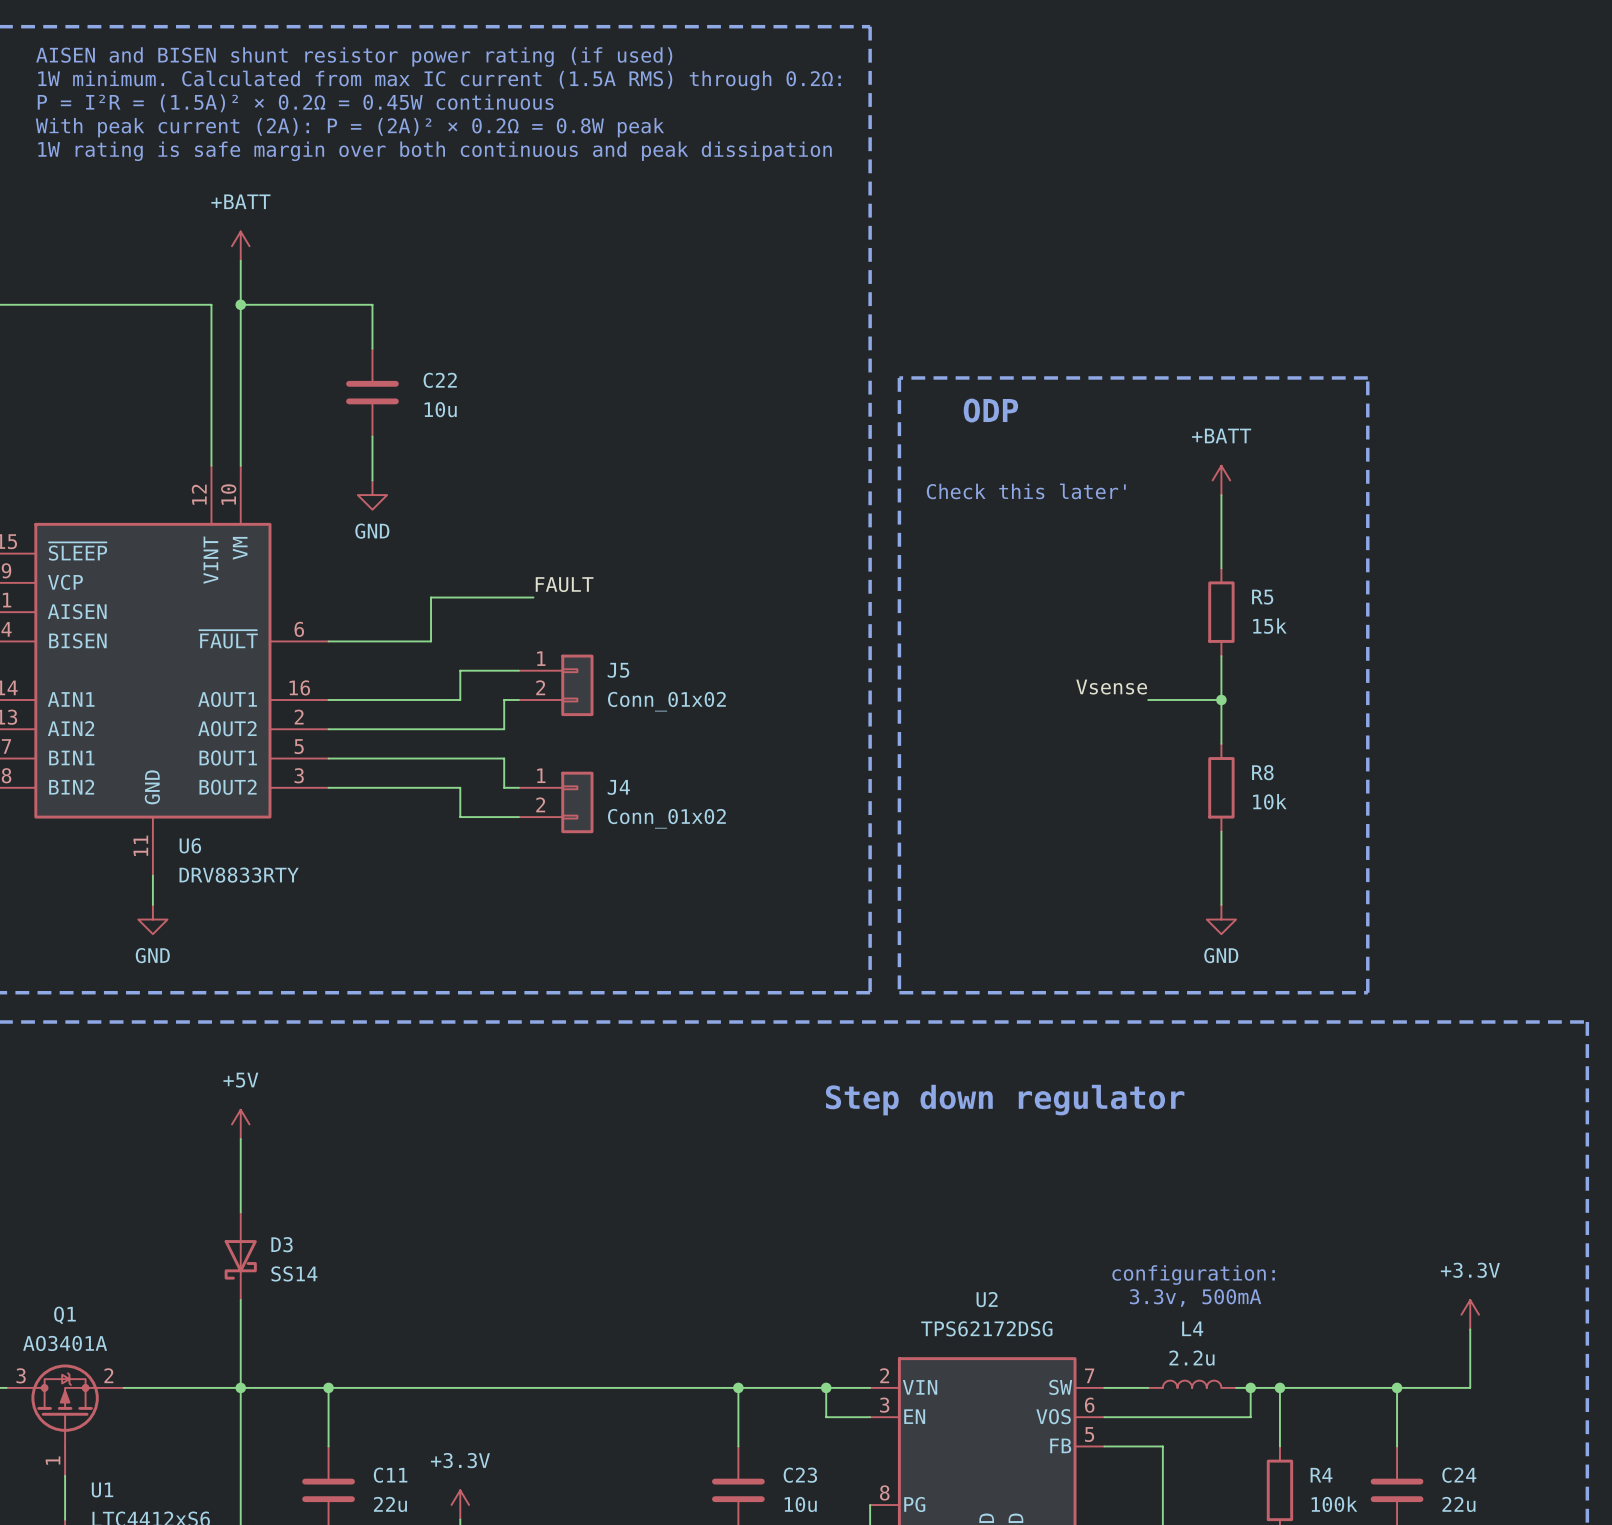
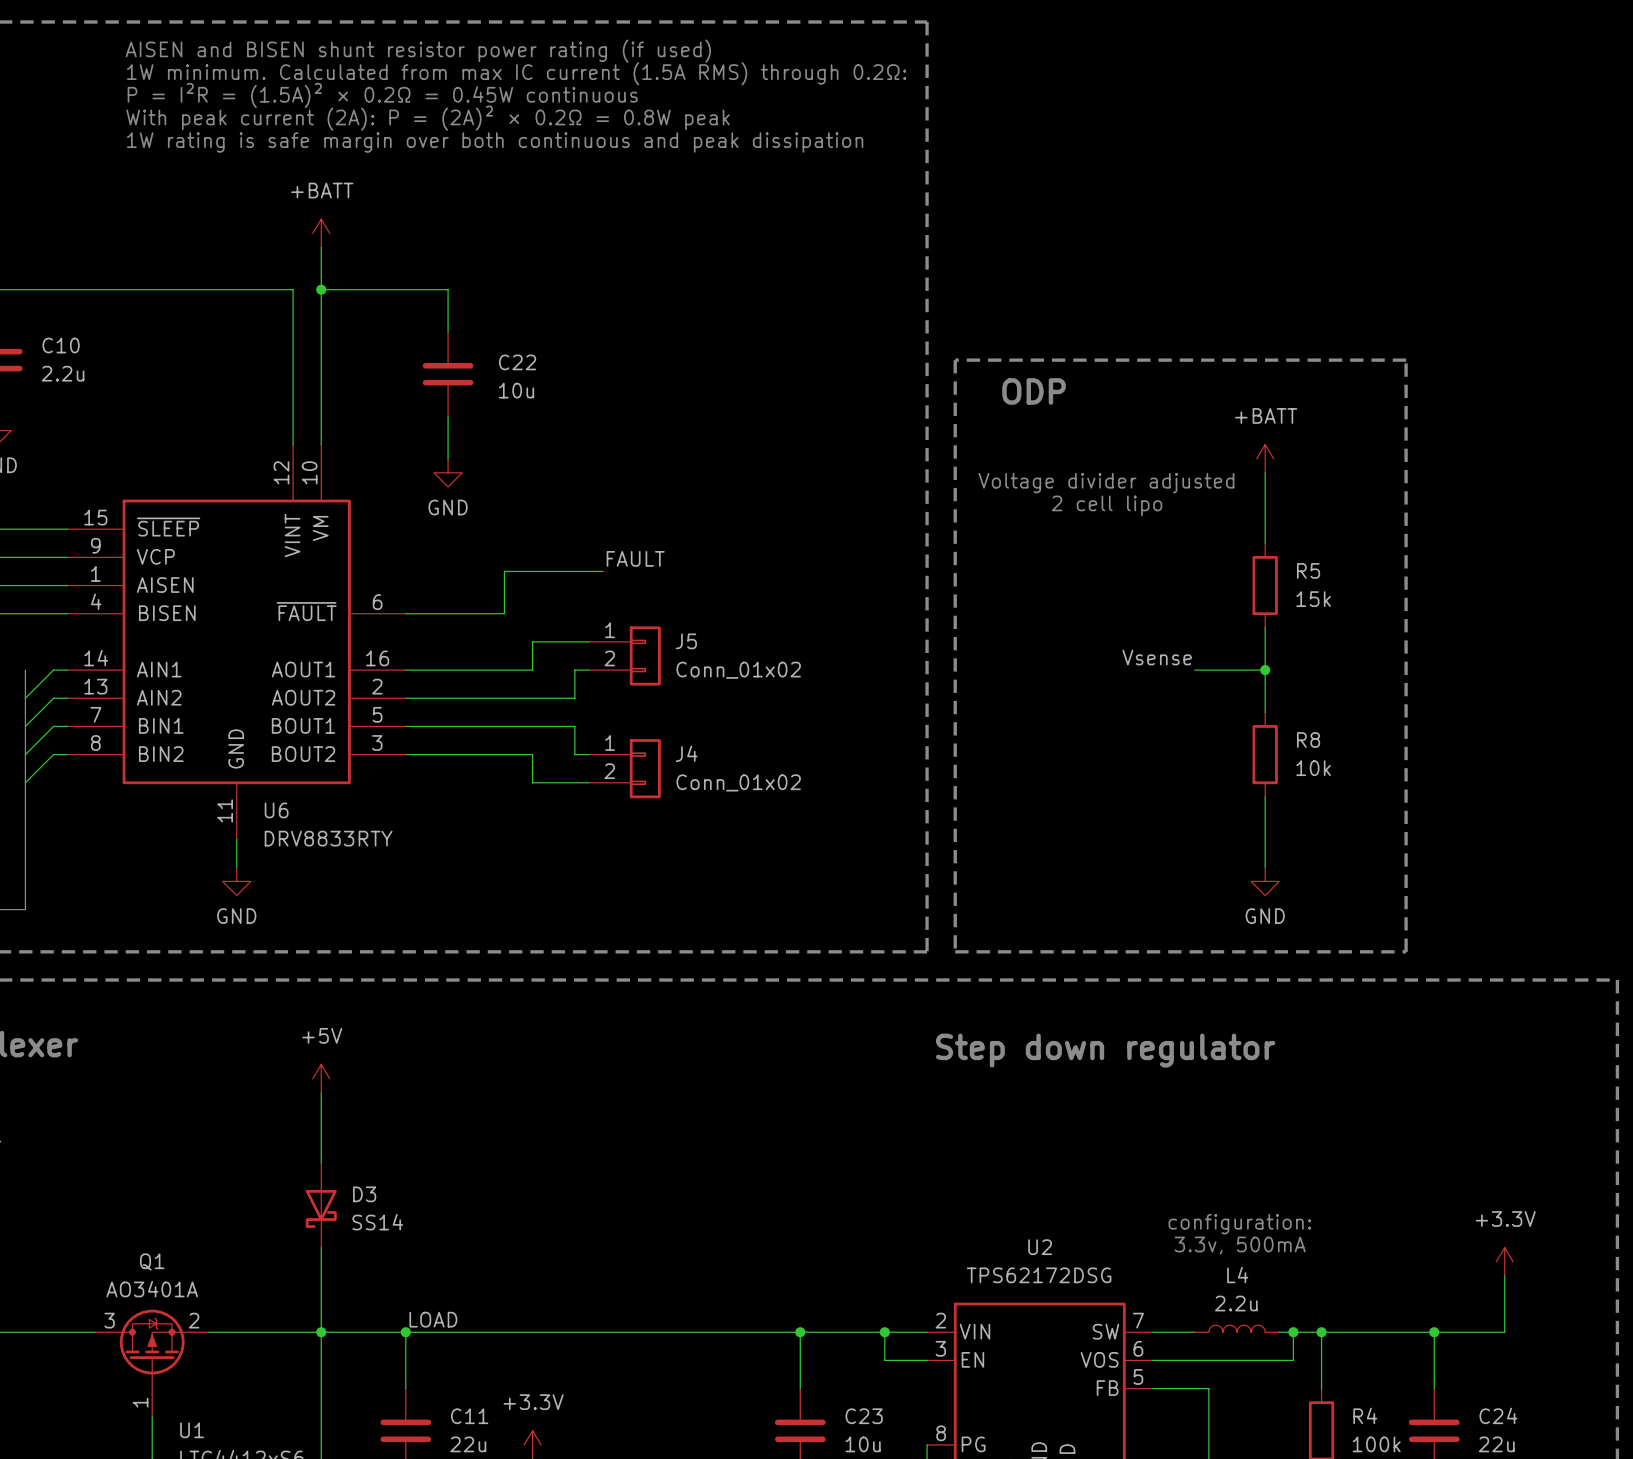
text: Check this later' (1026, 491) -> none
text: none -> Voltage divider adjusted (1106, 483)
text: none -> 2 cell lipo (1107, 505)
text position: Step down regulator (1005, 1100) -> Step down regulator (1105, 1050)
label: none -> LOAD (433, 1319)

